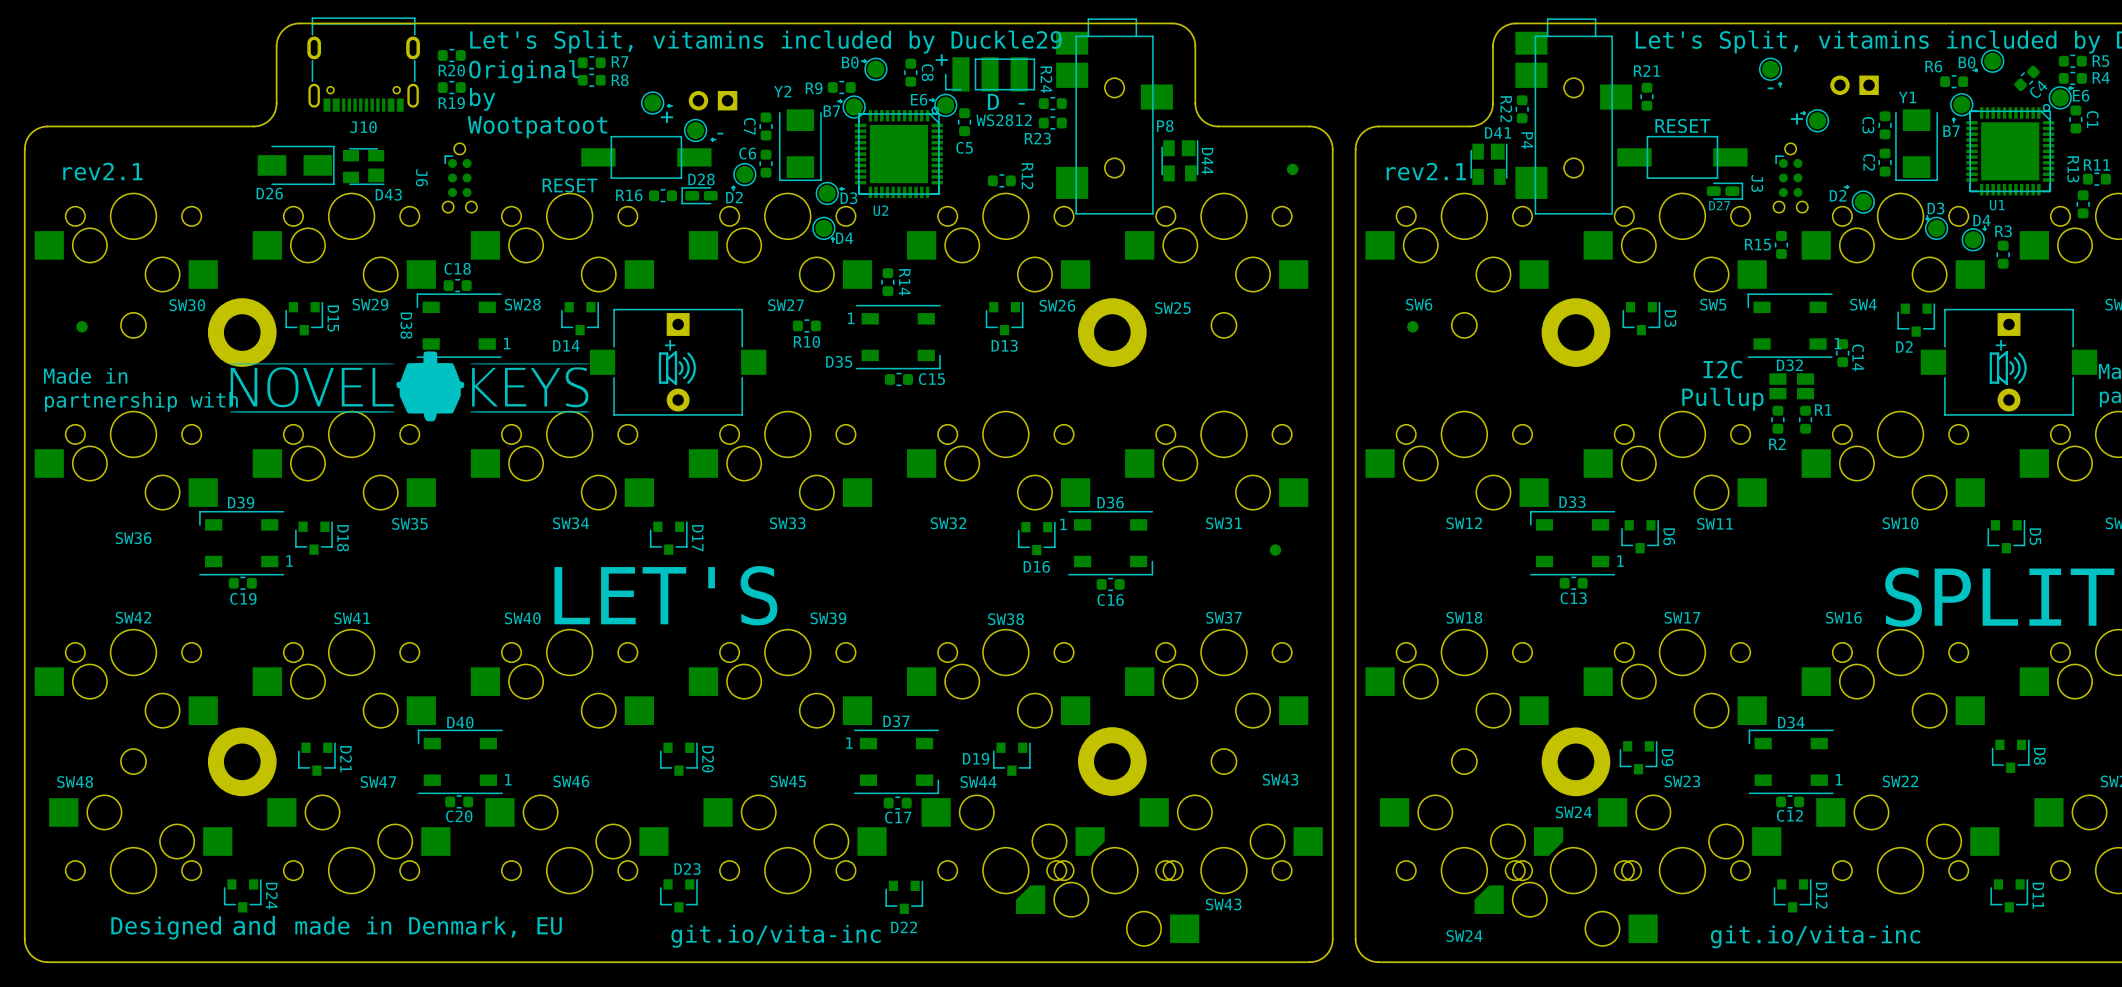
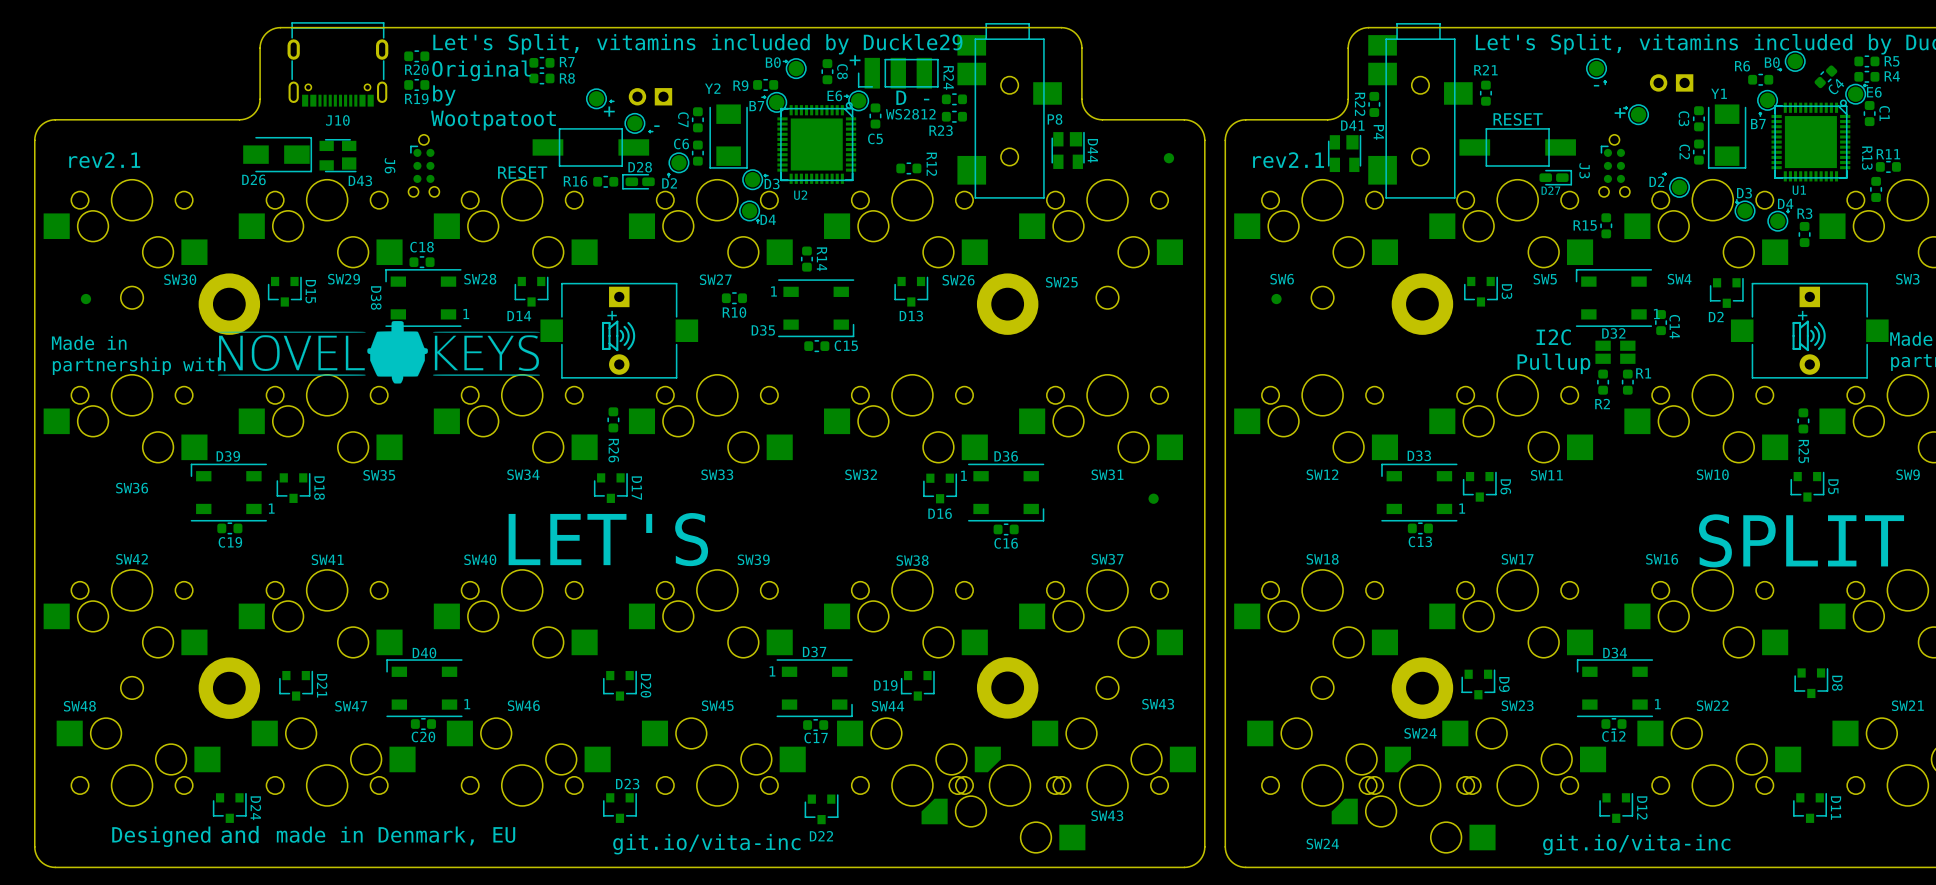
R26: none -> (613, 419)
R25: none -> (1803, 420)

